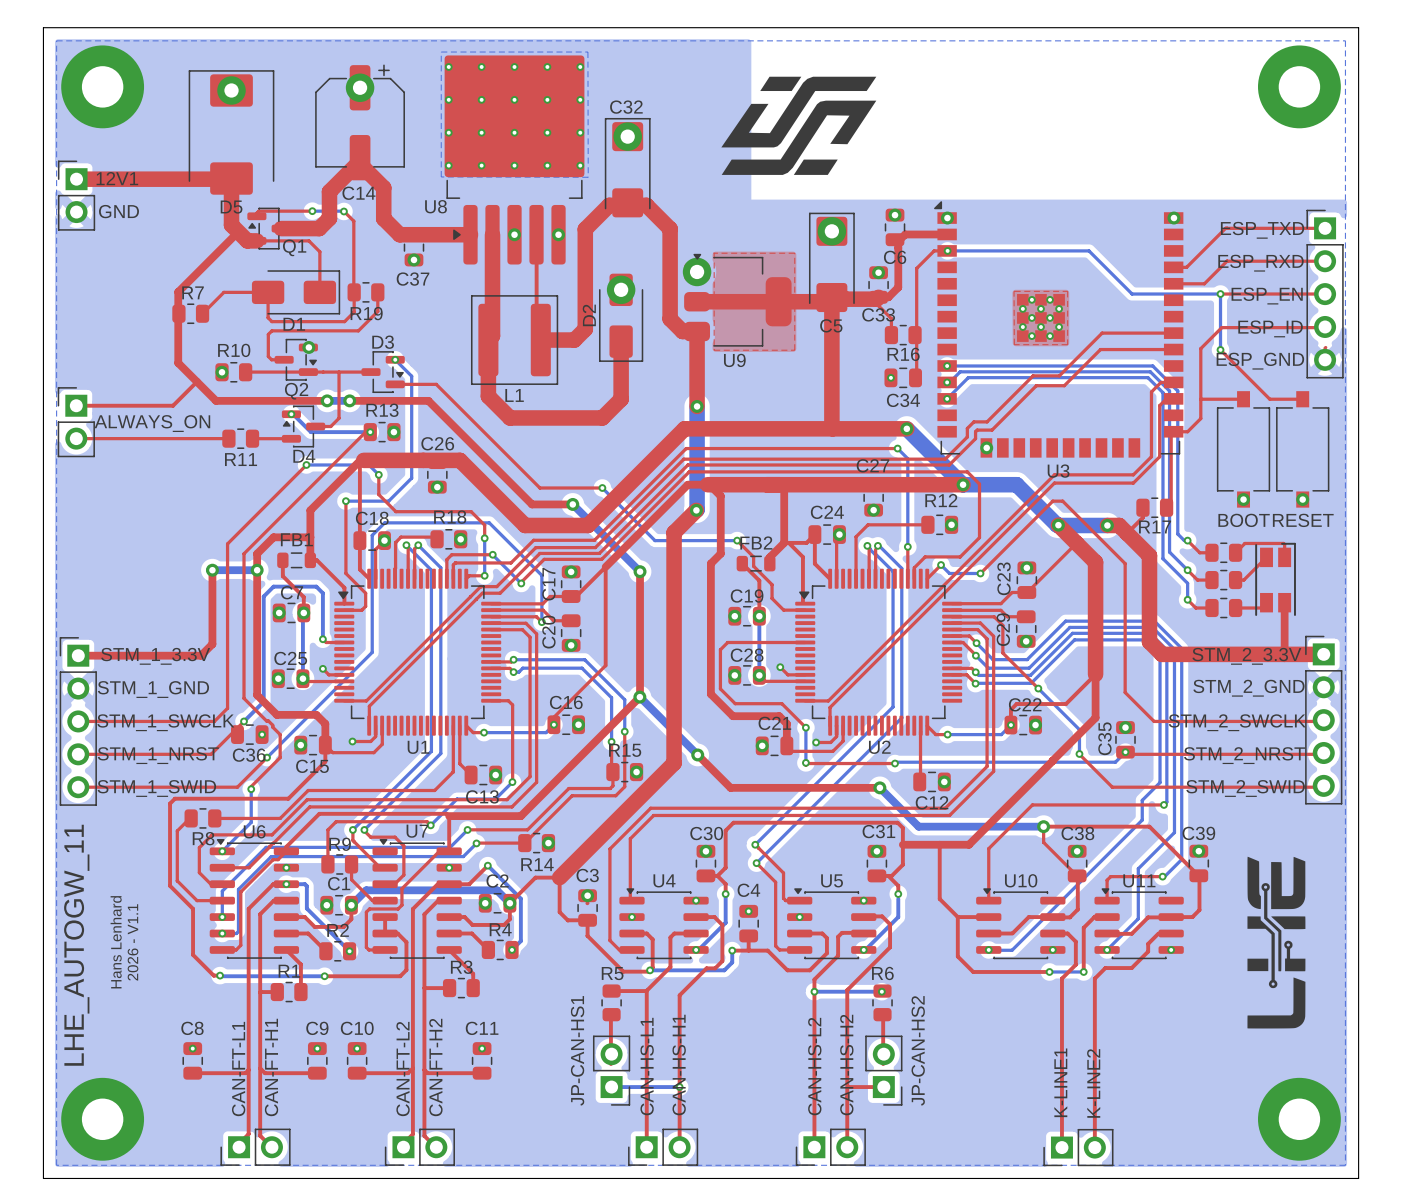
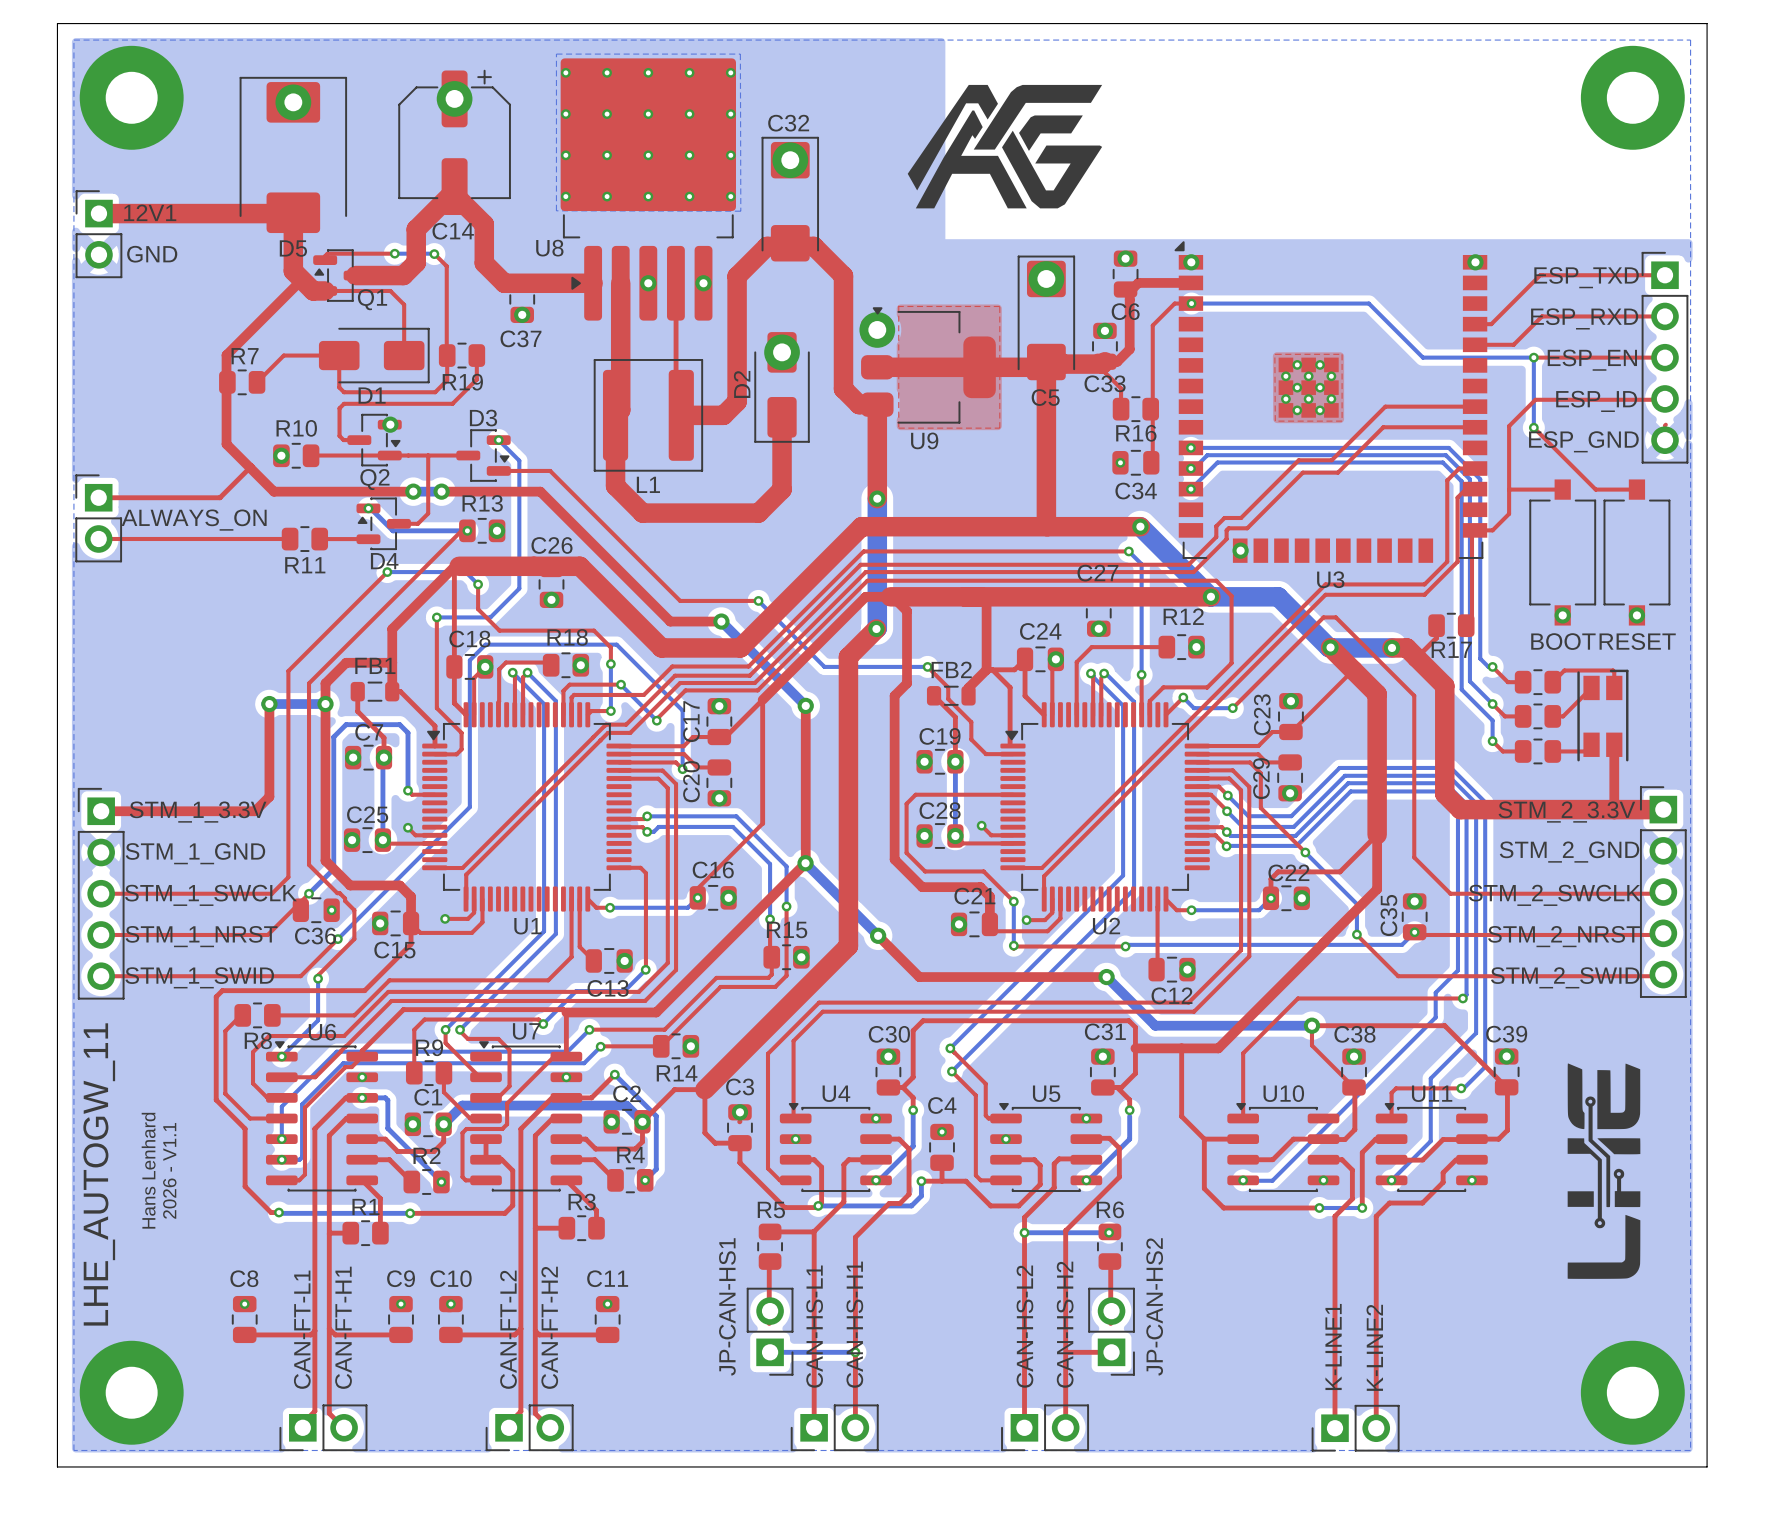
drawing shape: [721, 76, 877, 175] -> [907, 84, 1103, 209]

